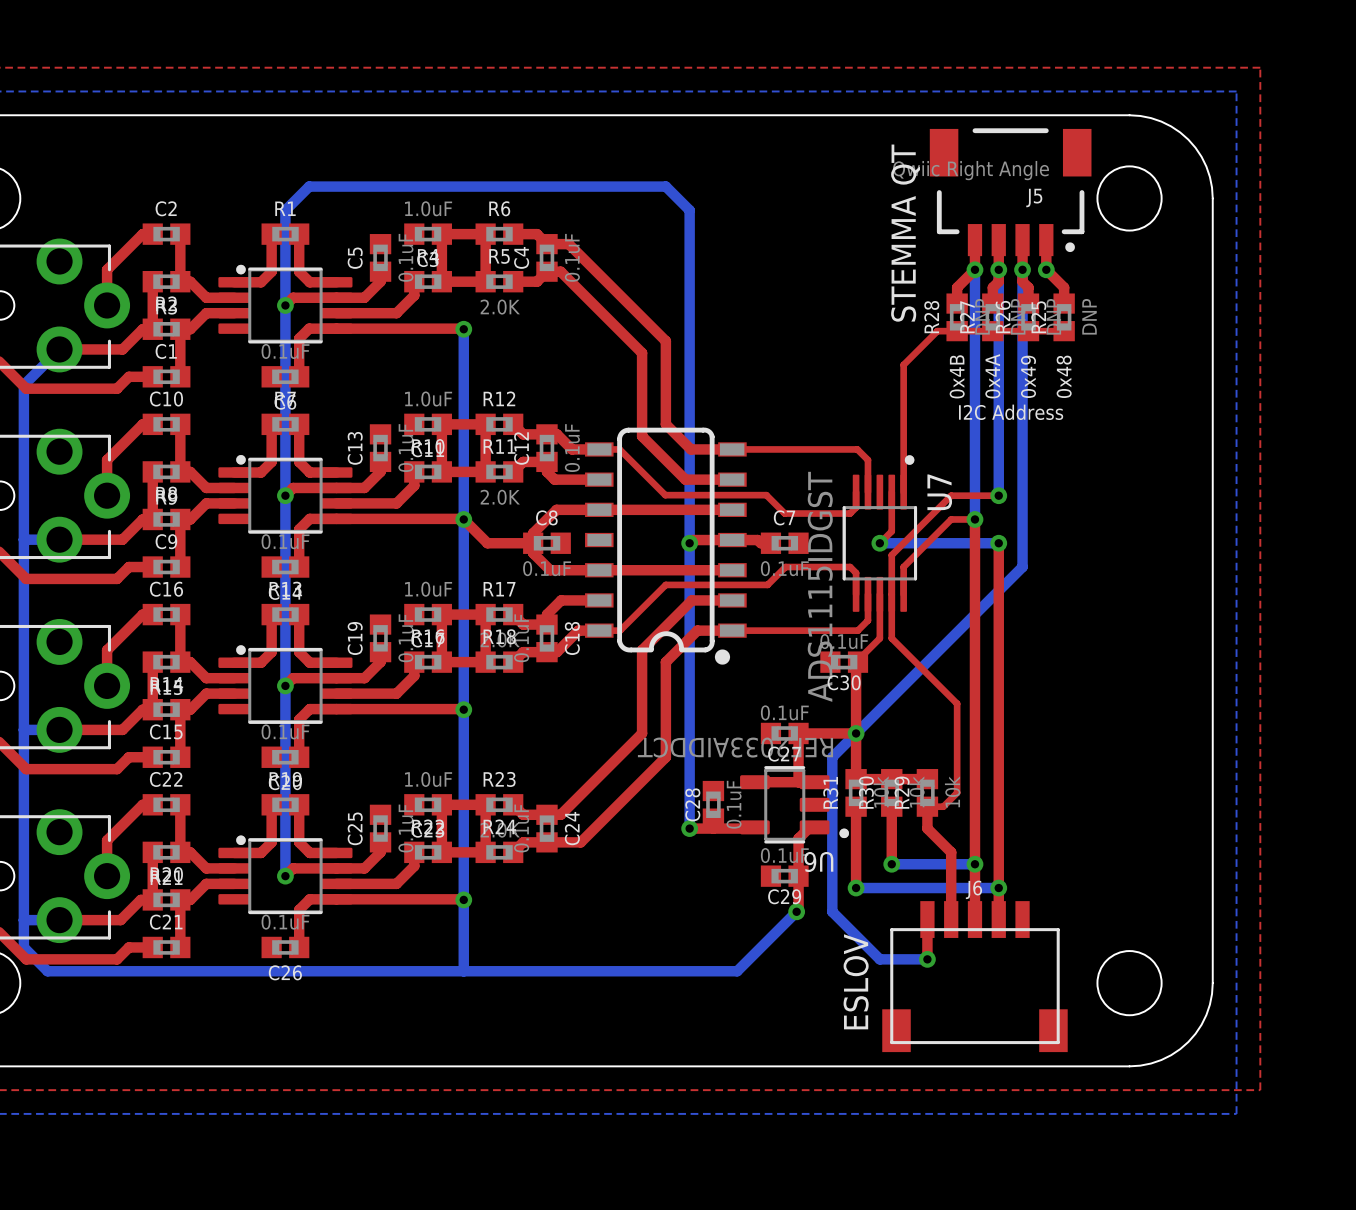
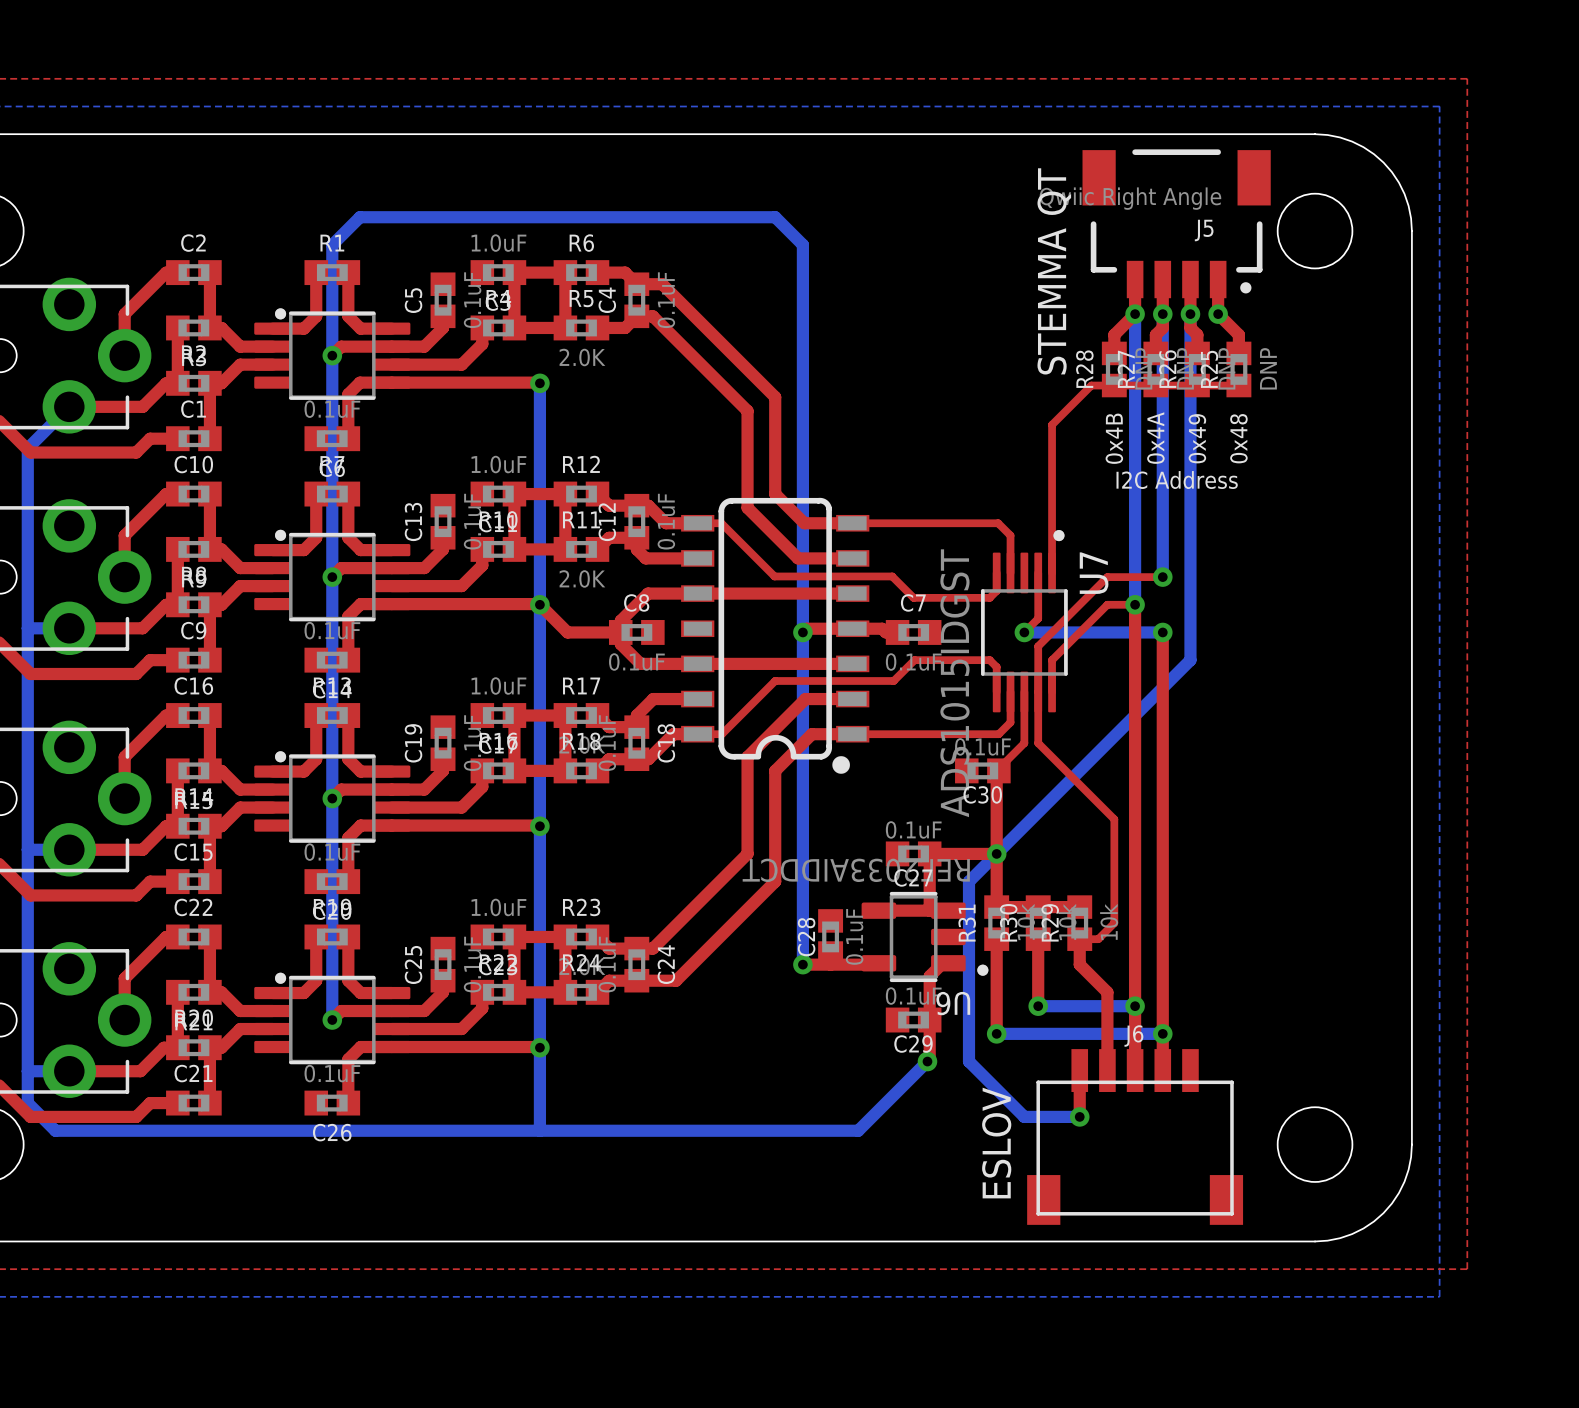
U7 value: ADS1115IDGST (820, 586) -> ADS1015IDGST (954, 683)

